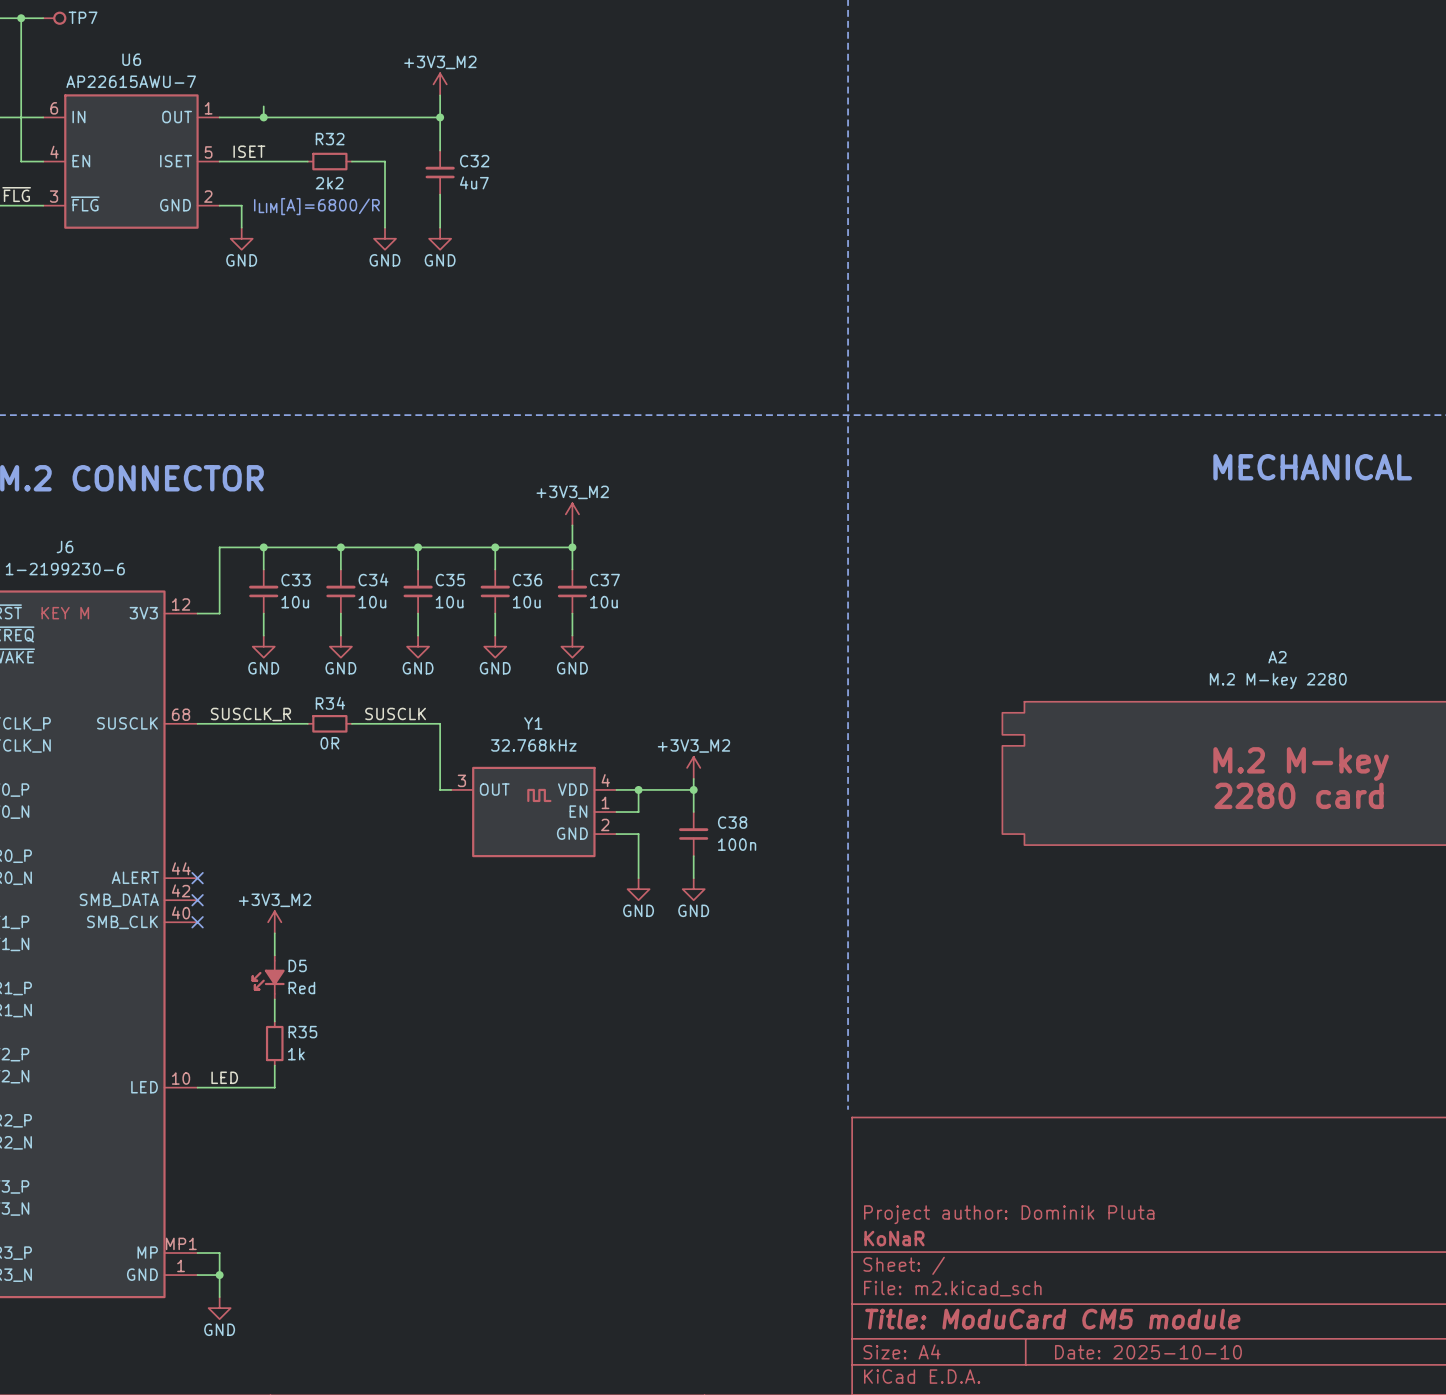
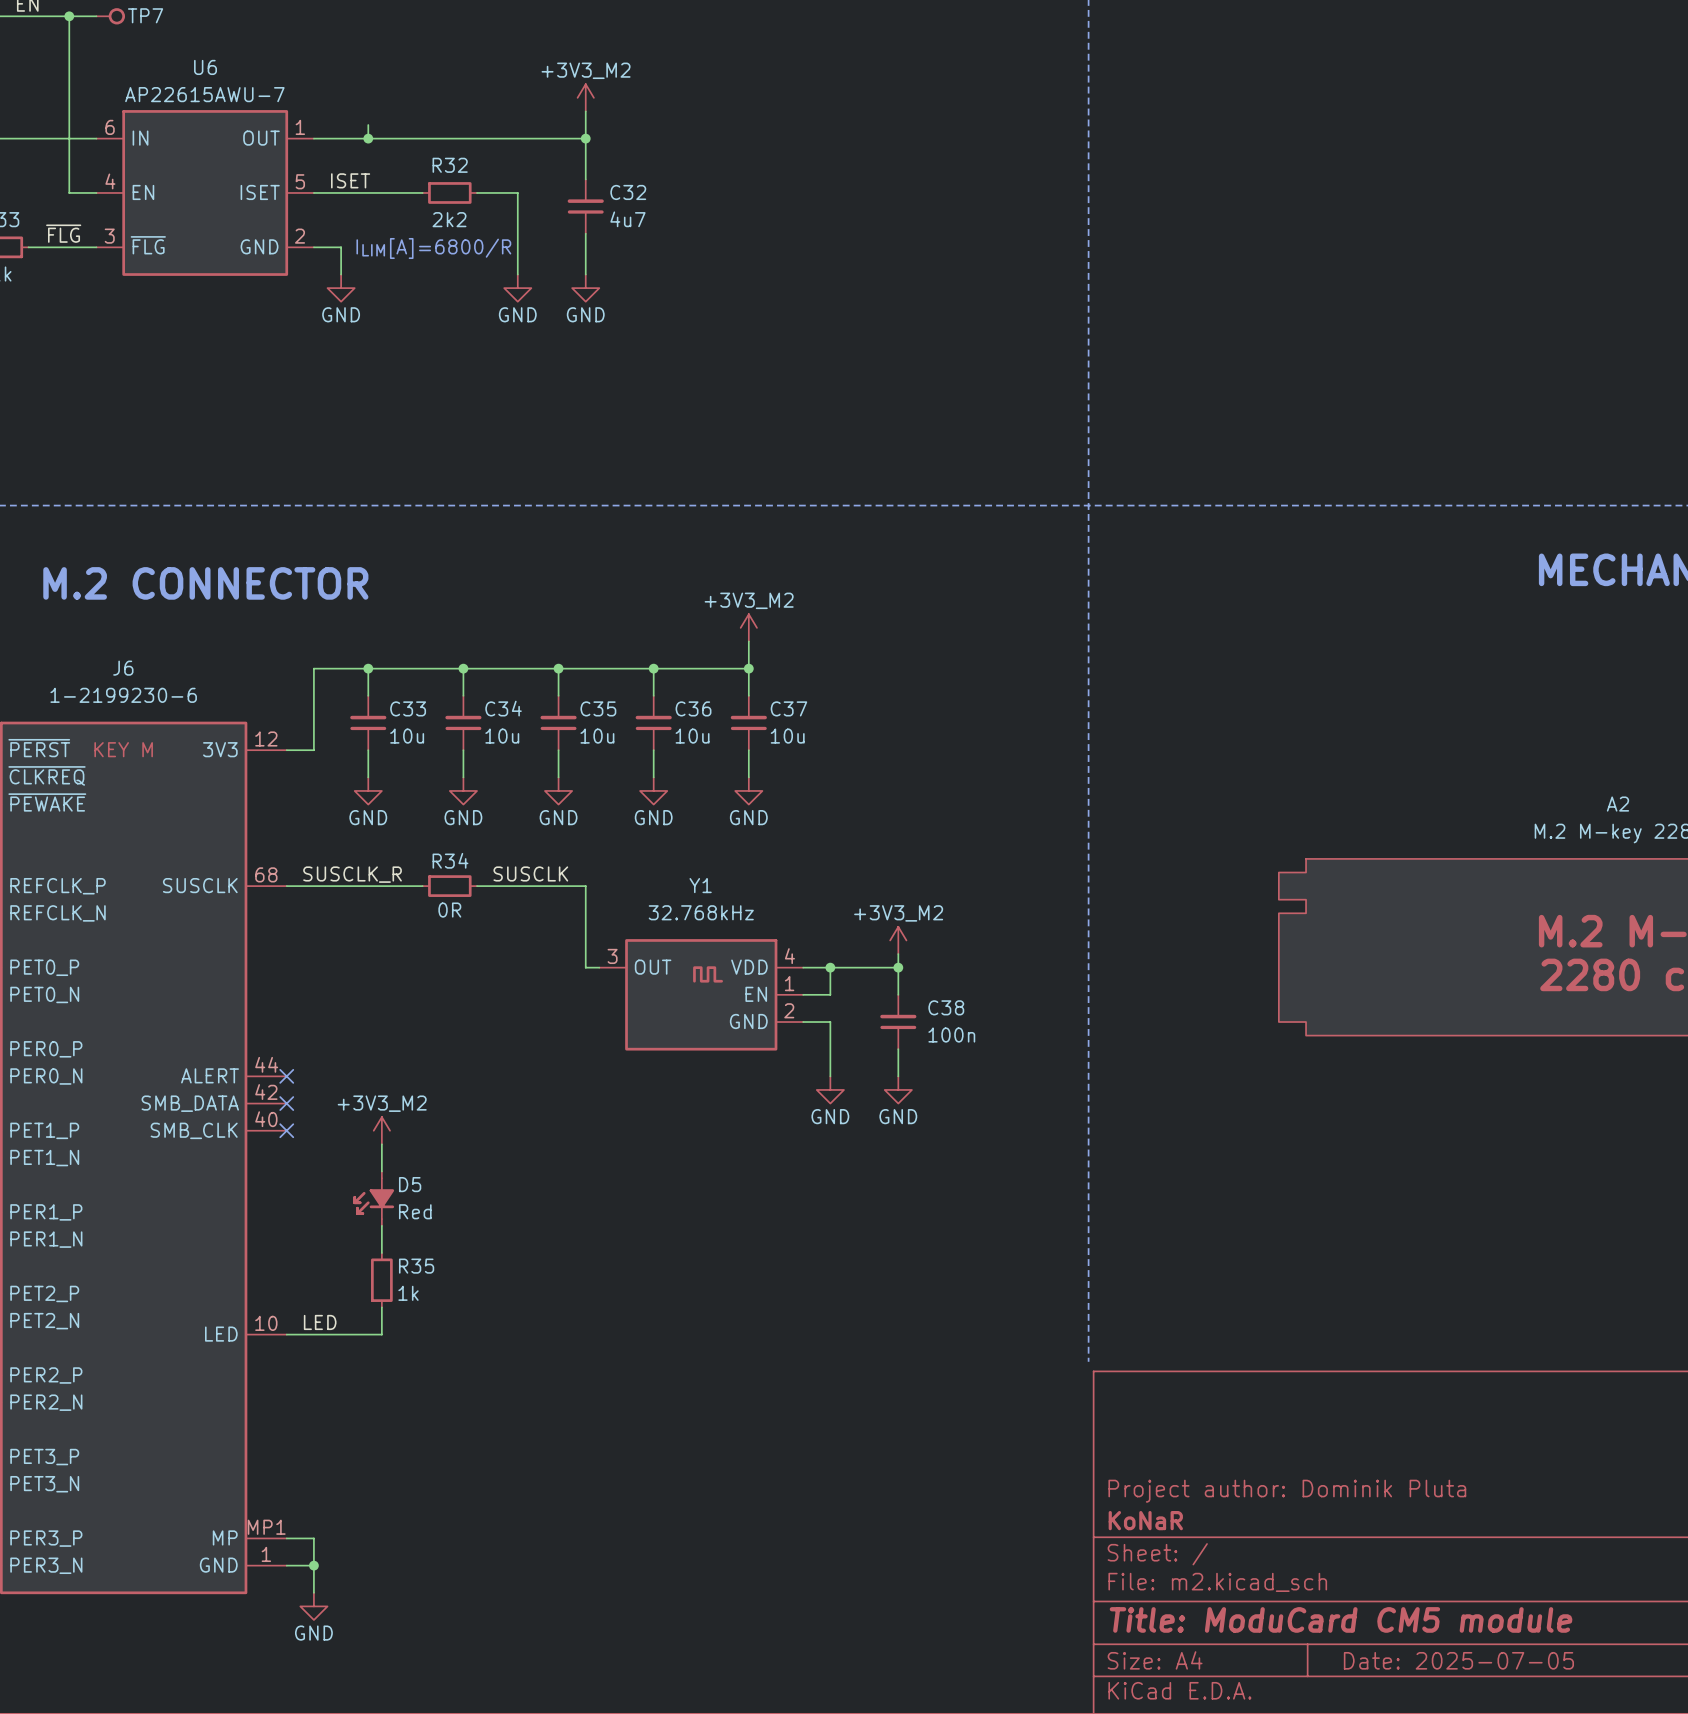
title block: Date: 2025-10-10 (1148, 1352) -> Date: 2025-07-05 (1458, 1660)

